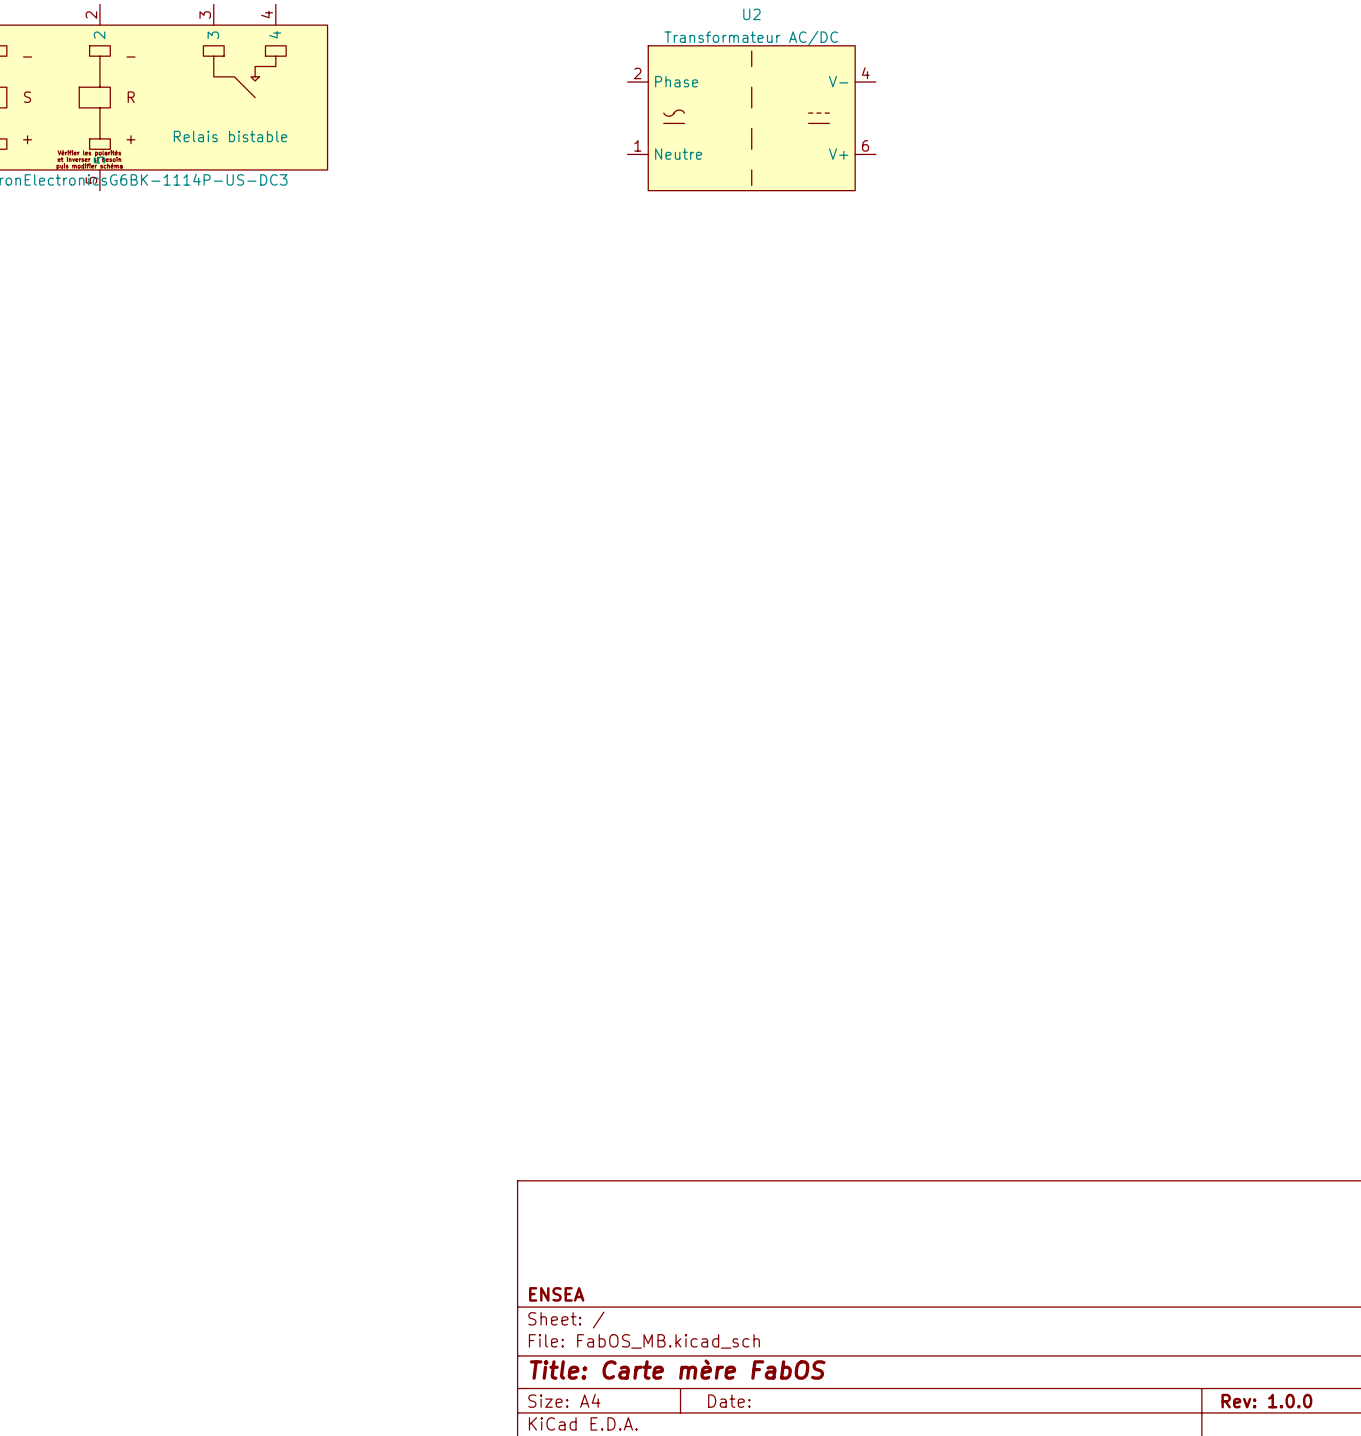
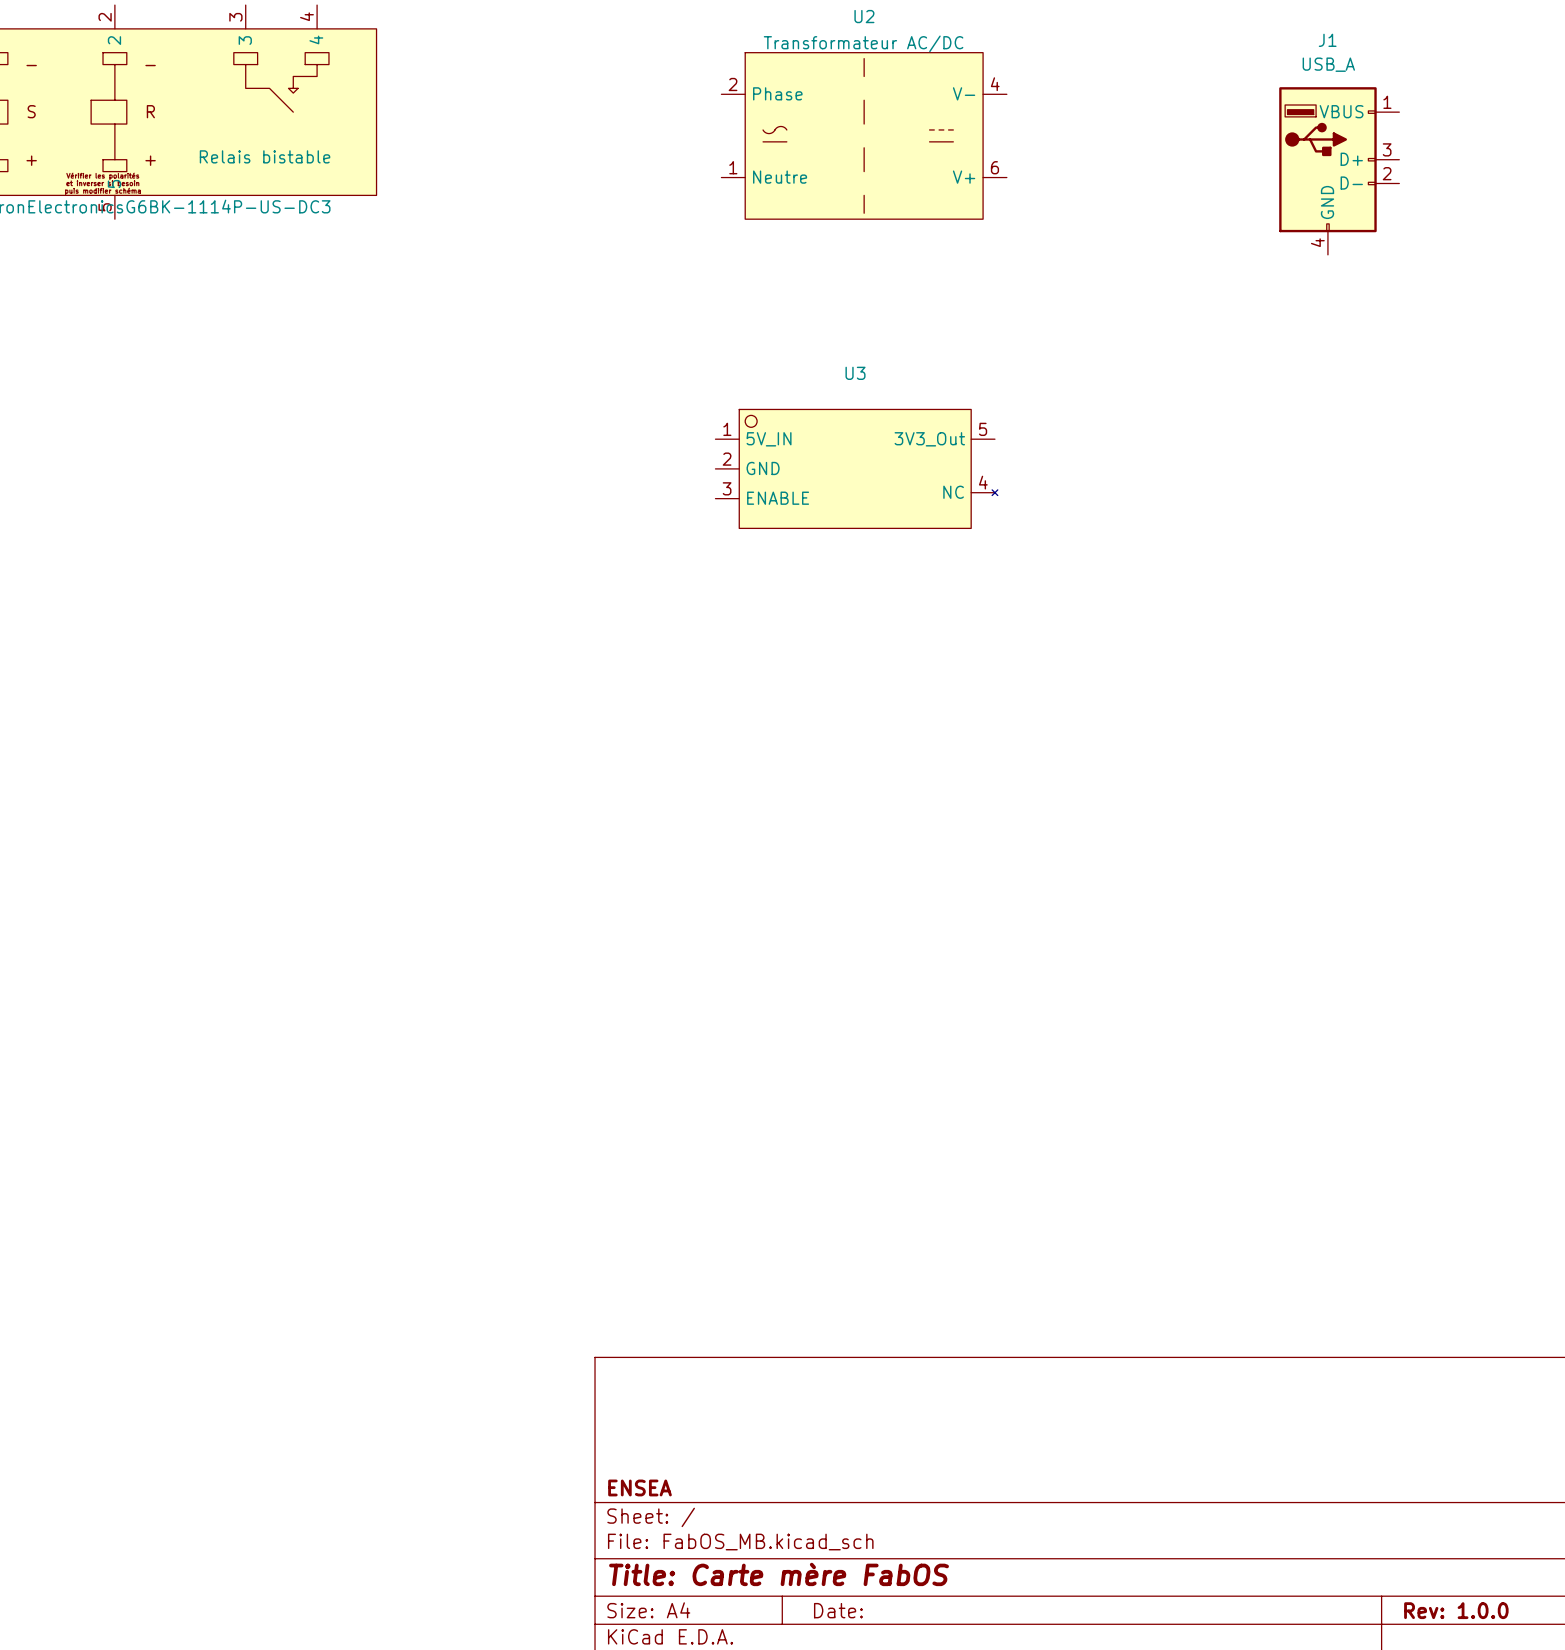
J1: none -> USB_A (1339, 171)
U3: none -> (856, 468)

